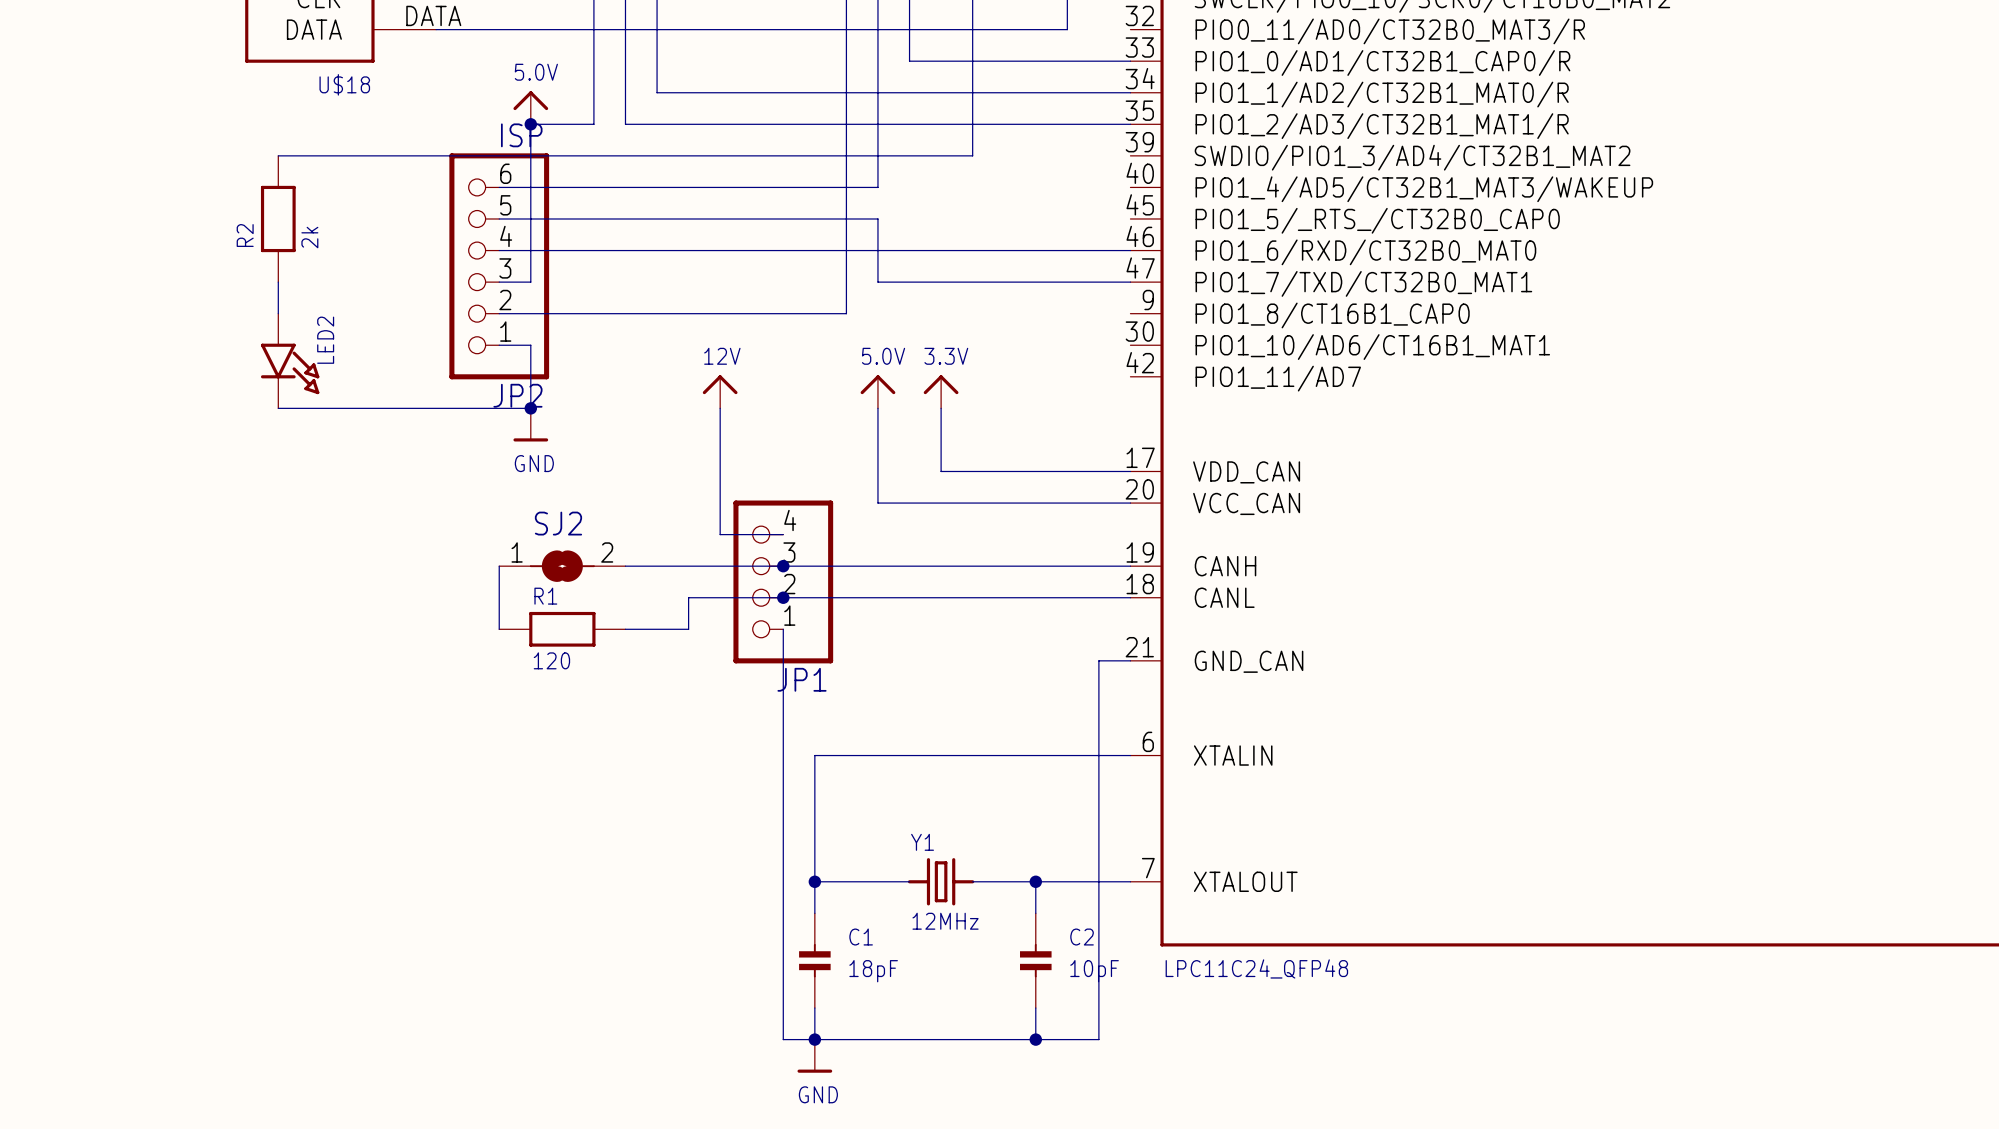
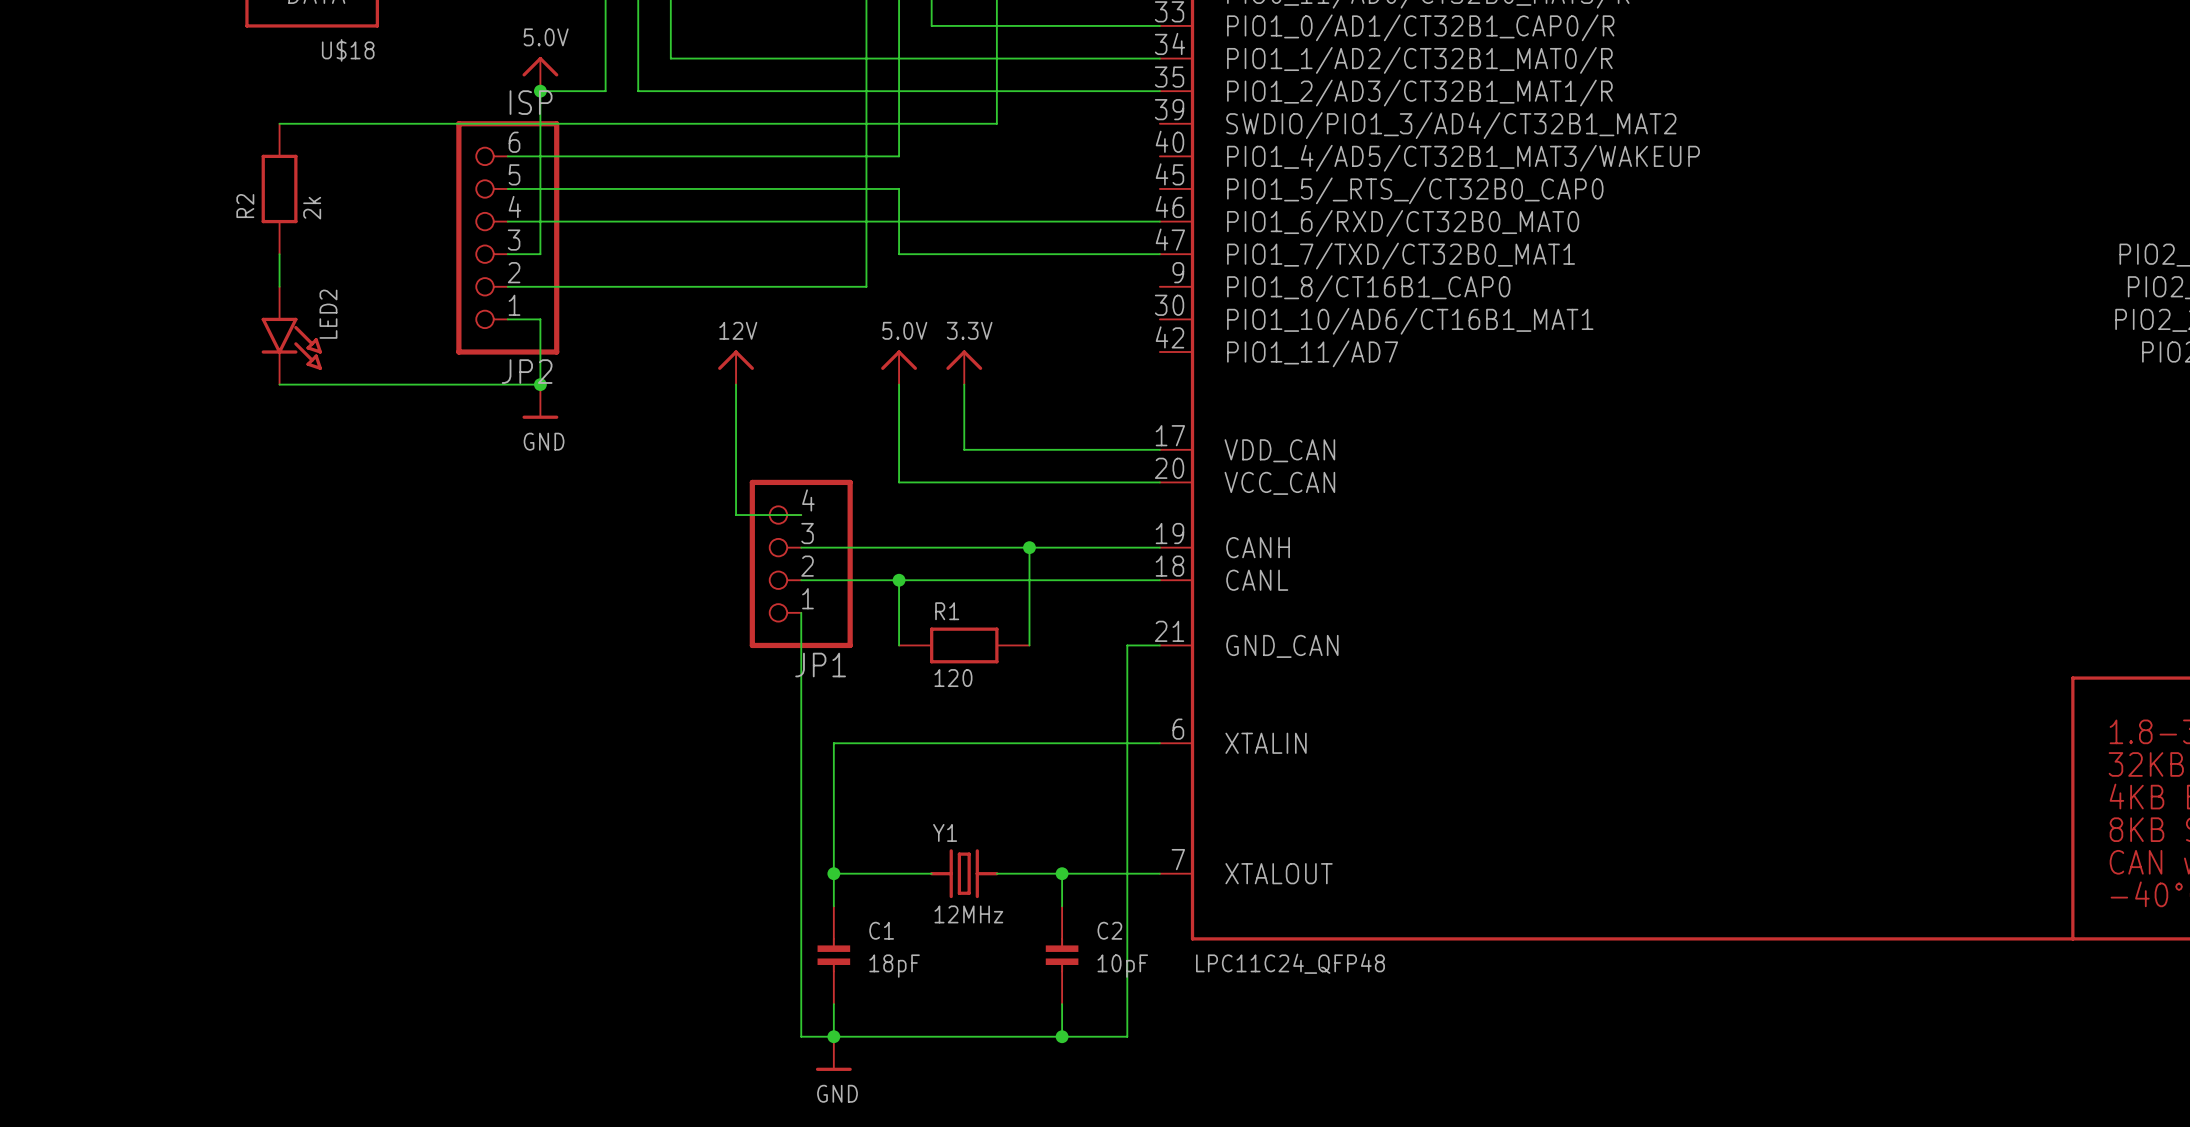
wire: (499, 566) (499, 629) -> none
SJ2: (562, 566) -> none
wire: (625, 566) (783, 566) -> none
junction: (783, 566) -> none
wire: none -> (1029, 547) (1029, 645)
junction: none -> (1029, 547)
wire: (783, 597) (688, 597) (688, 629) (625, 629) -> none
junction: (783, 597) -> none
wire: none -> (899, 580) (899, 645)
junction: none -> (899, 580)
R1 position: (562, 629) -> (964, 645)

